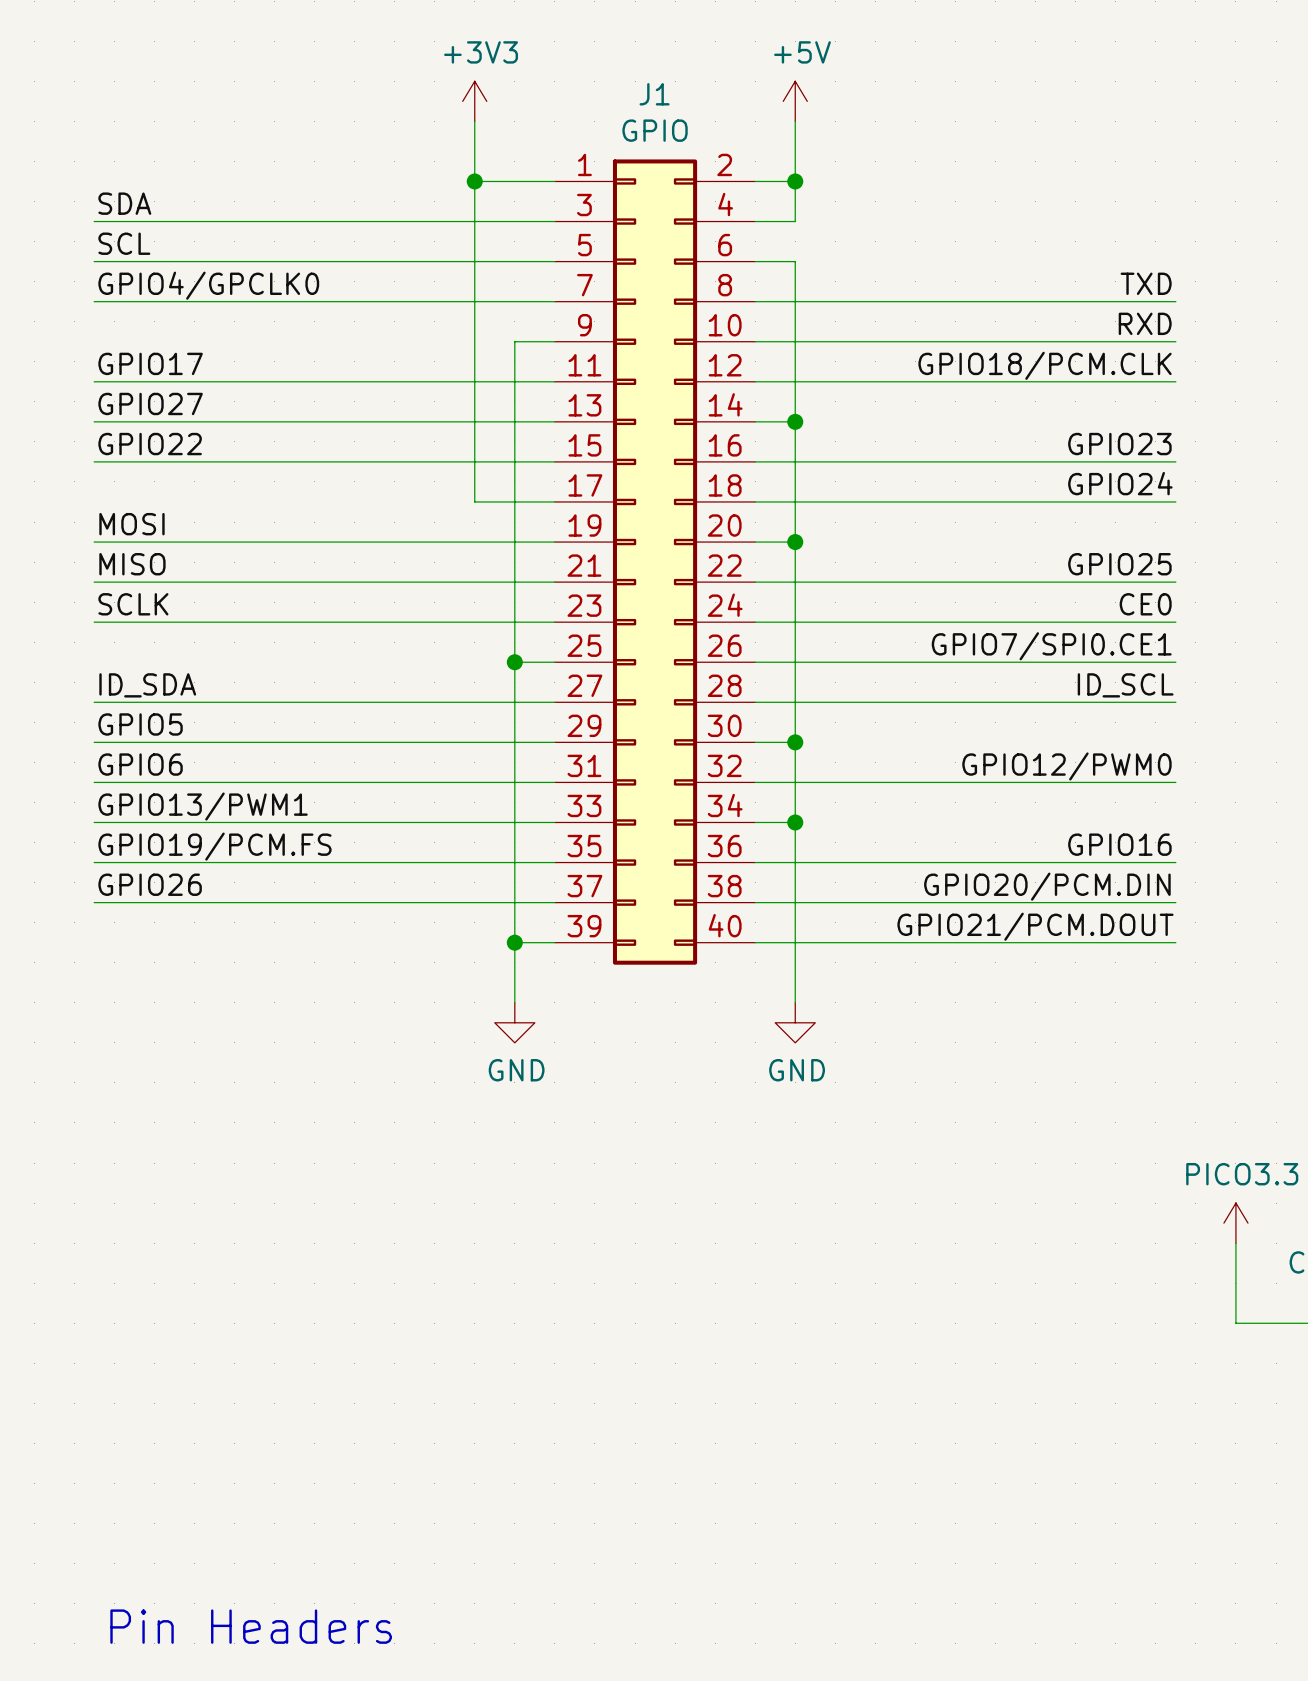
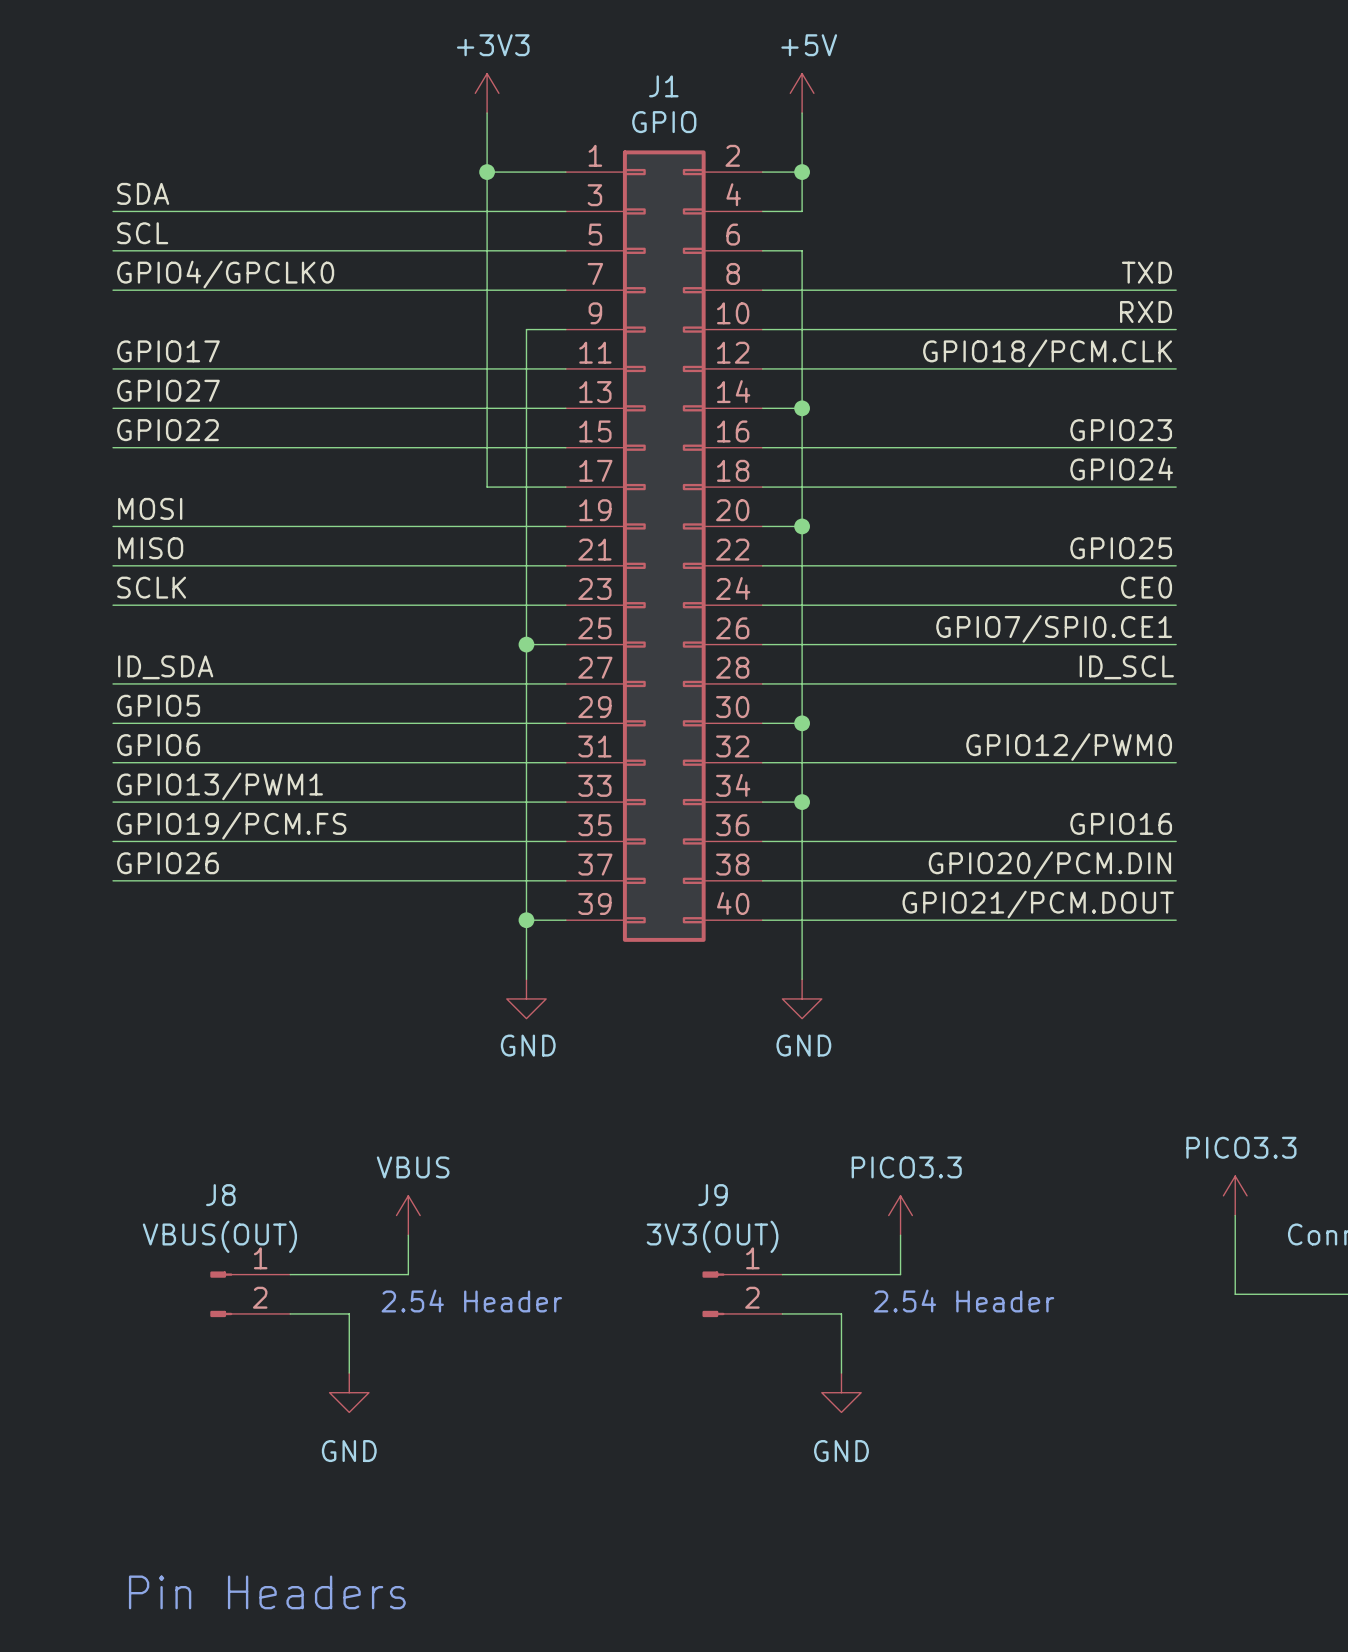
power symbol: none -> VBUS (408, 1215)
power symbol: none -> PICO3.3 (900, 1215)
wire: none -> (408, 1235) (408, 1274) (290, 1274)
wire: none -> (900, 1235) (900, 1274) (782, 1274)
J8: none -> VBUS(OUT) (250, 1294)
J9: none -> 3V3(OUT) (742, 1294)
text: none -> 2.54 Header (471, 1301)
text: none -> 2.54 Header (964, 1301)
wire: none -> (290, 1313) (349, 1313) (349, 1373)
wire: none -> (782, 1313) (841, 1313) (841, 1373)
power symbol: none -> GND (349, 1392)
power symbol: none -> GND (841, 1392)

